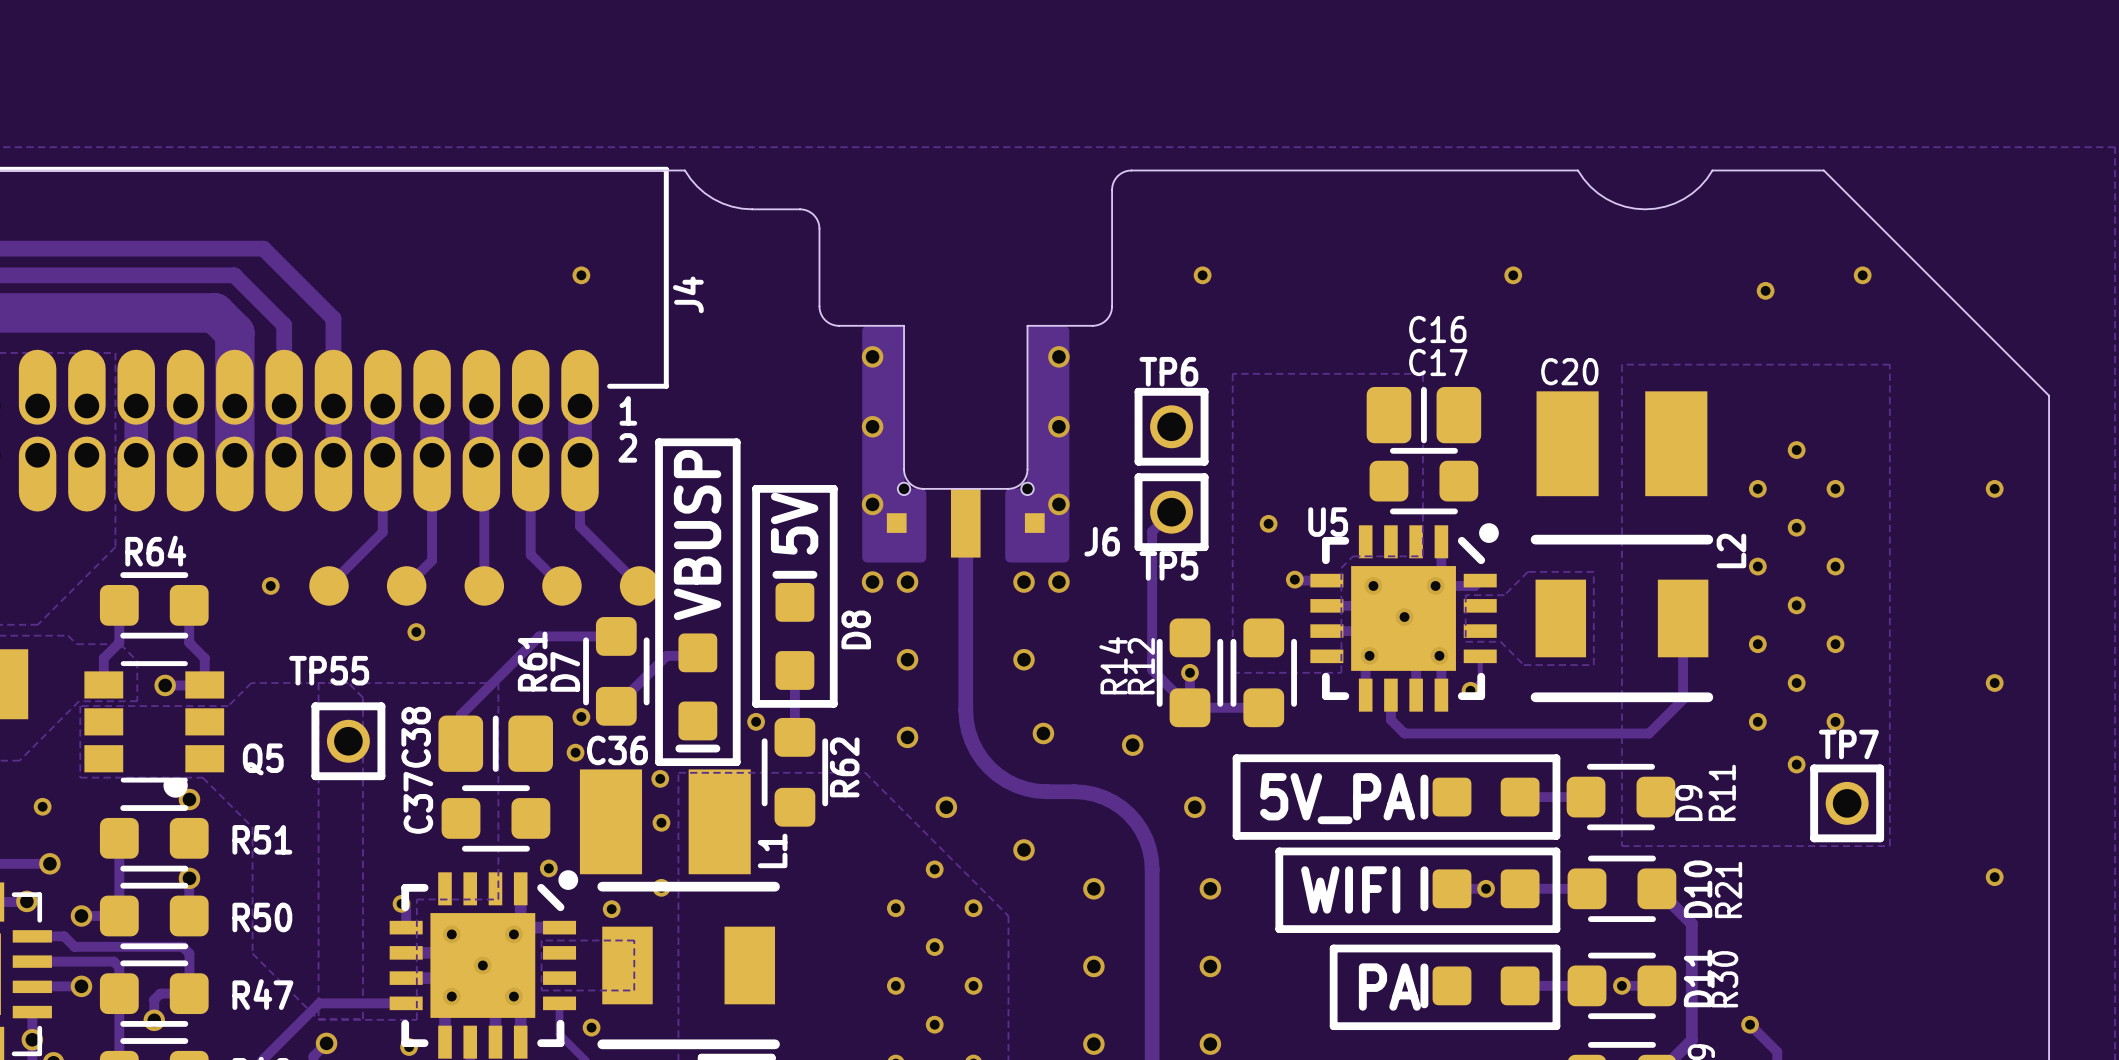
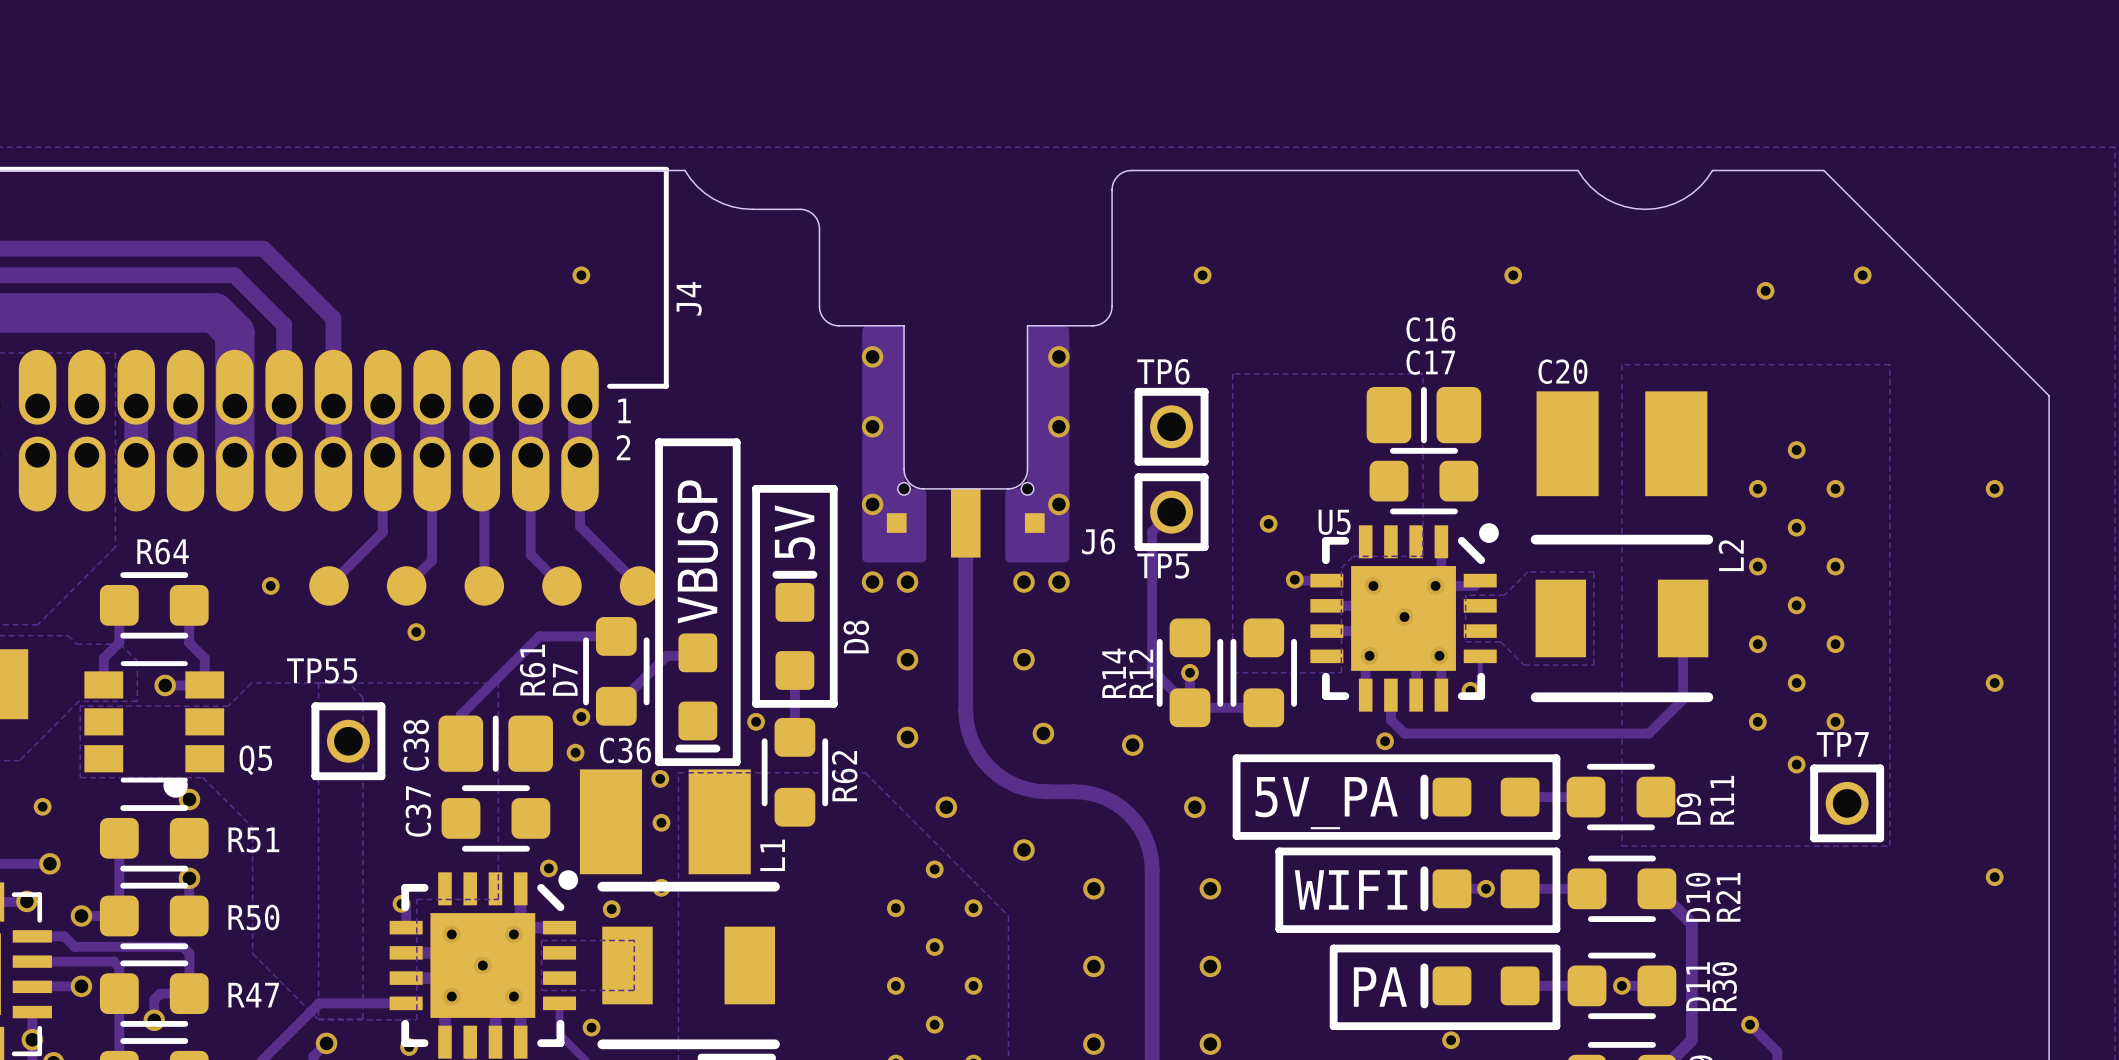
via: none -> (1385, 741)
via: none -> (1451, 1040)

